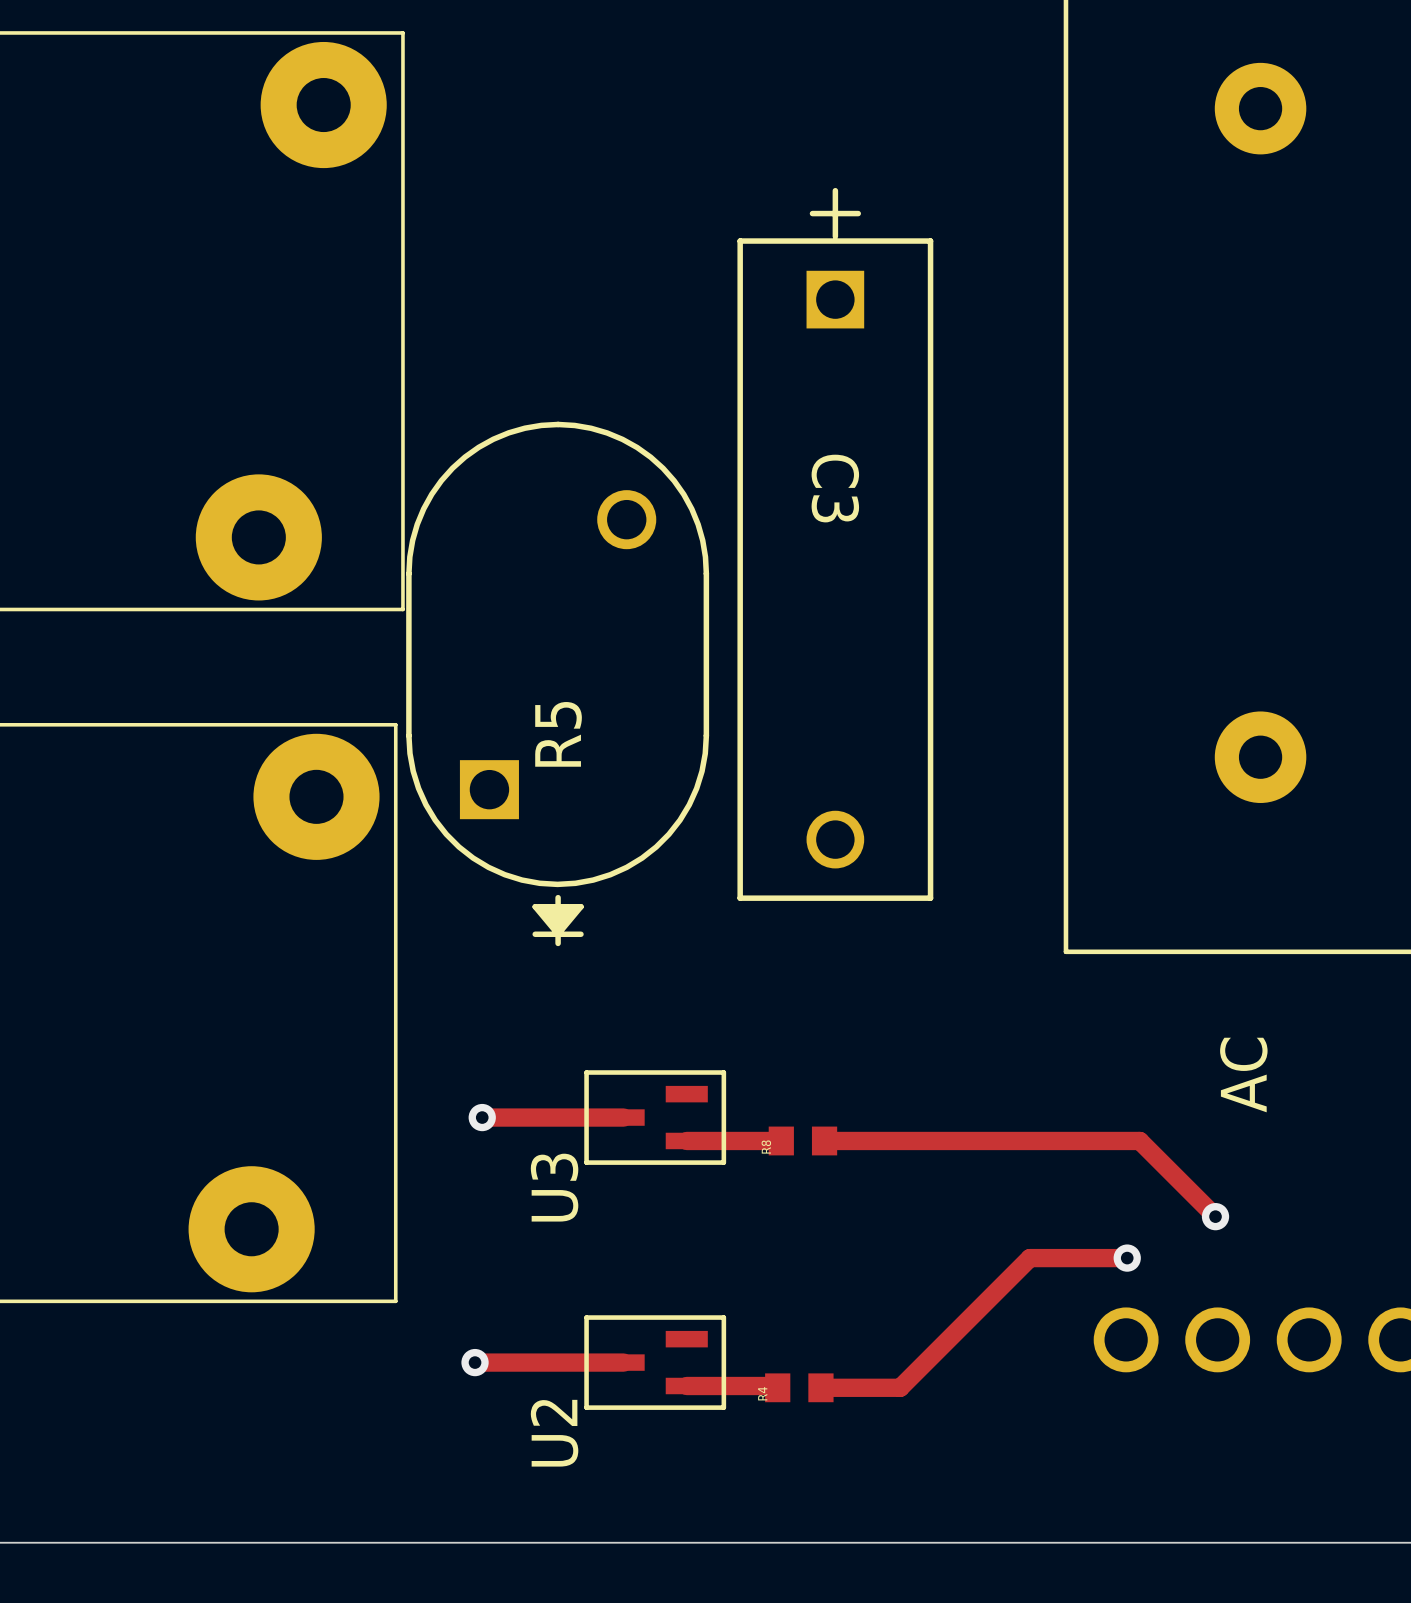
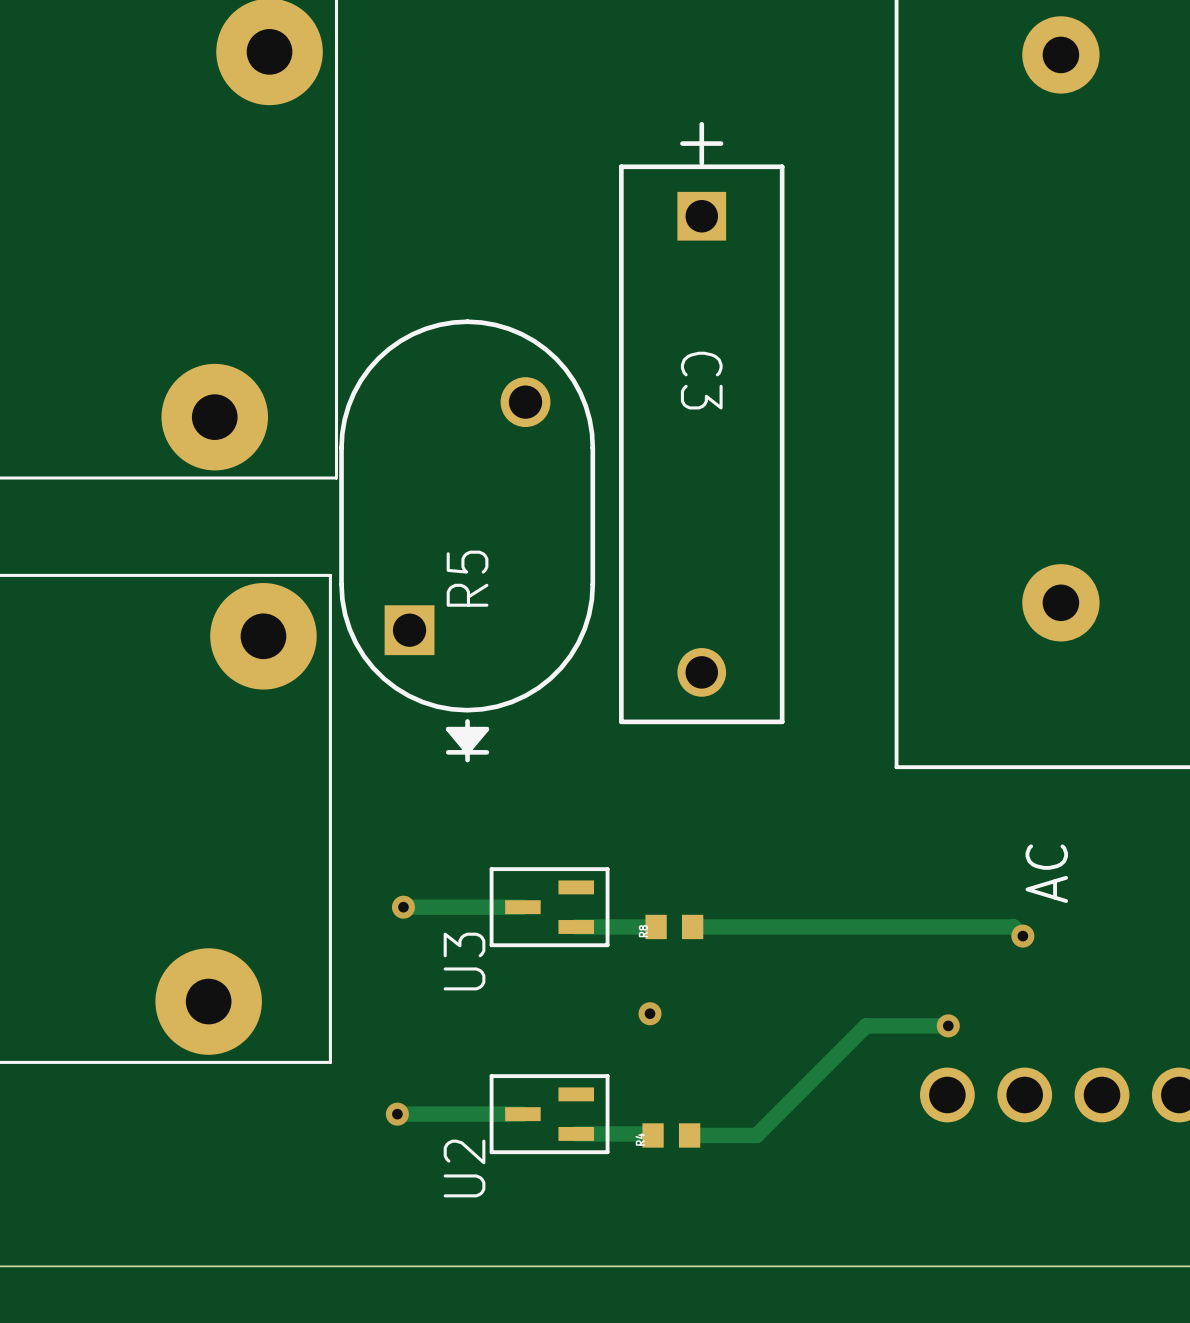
track: (1139, 1140) (1215, 1216) -> (958, 926) (1013, 926) (1022, 936)
via position: (1215, 1216) -> (1022, 936)
via: none -> (650, 1013)

